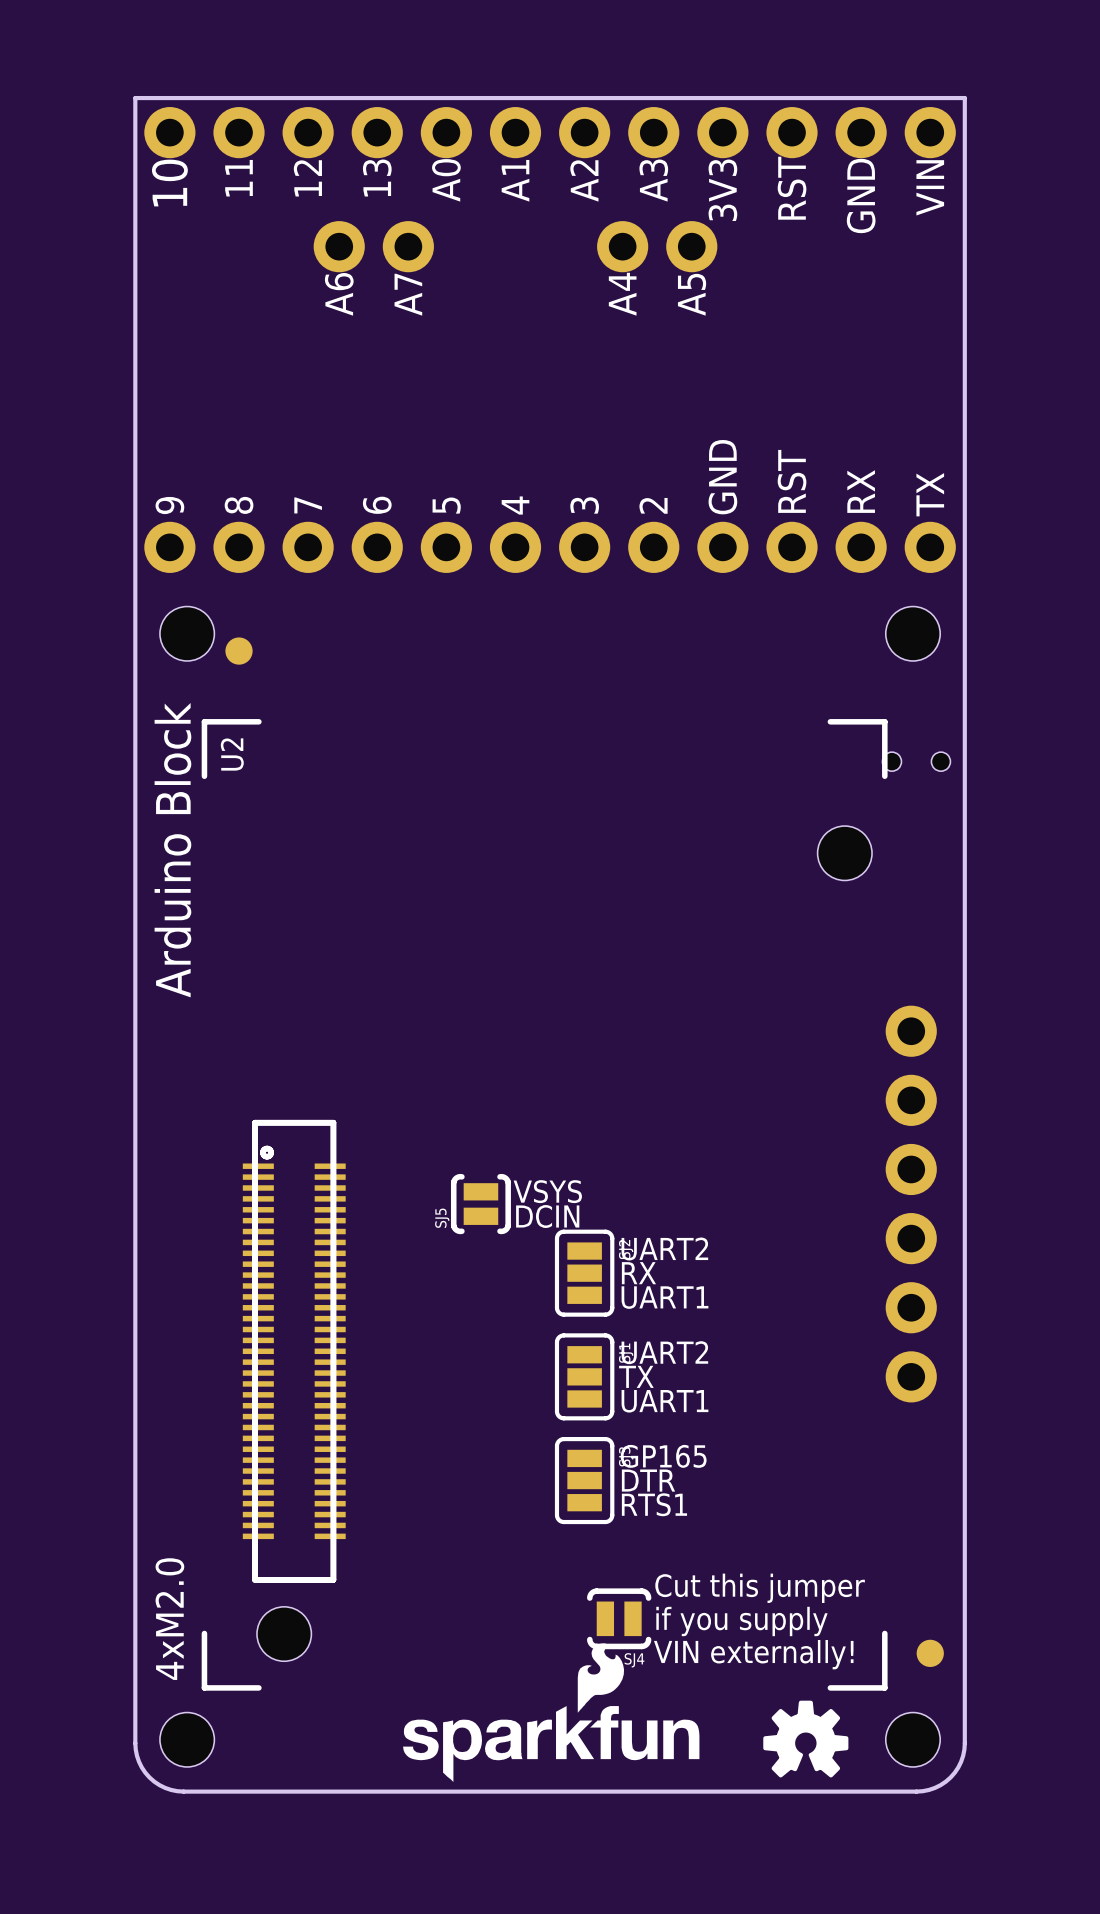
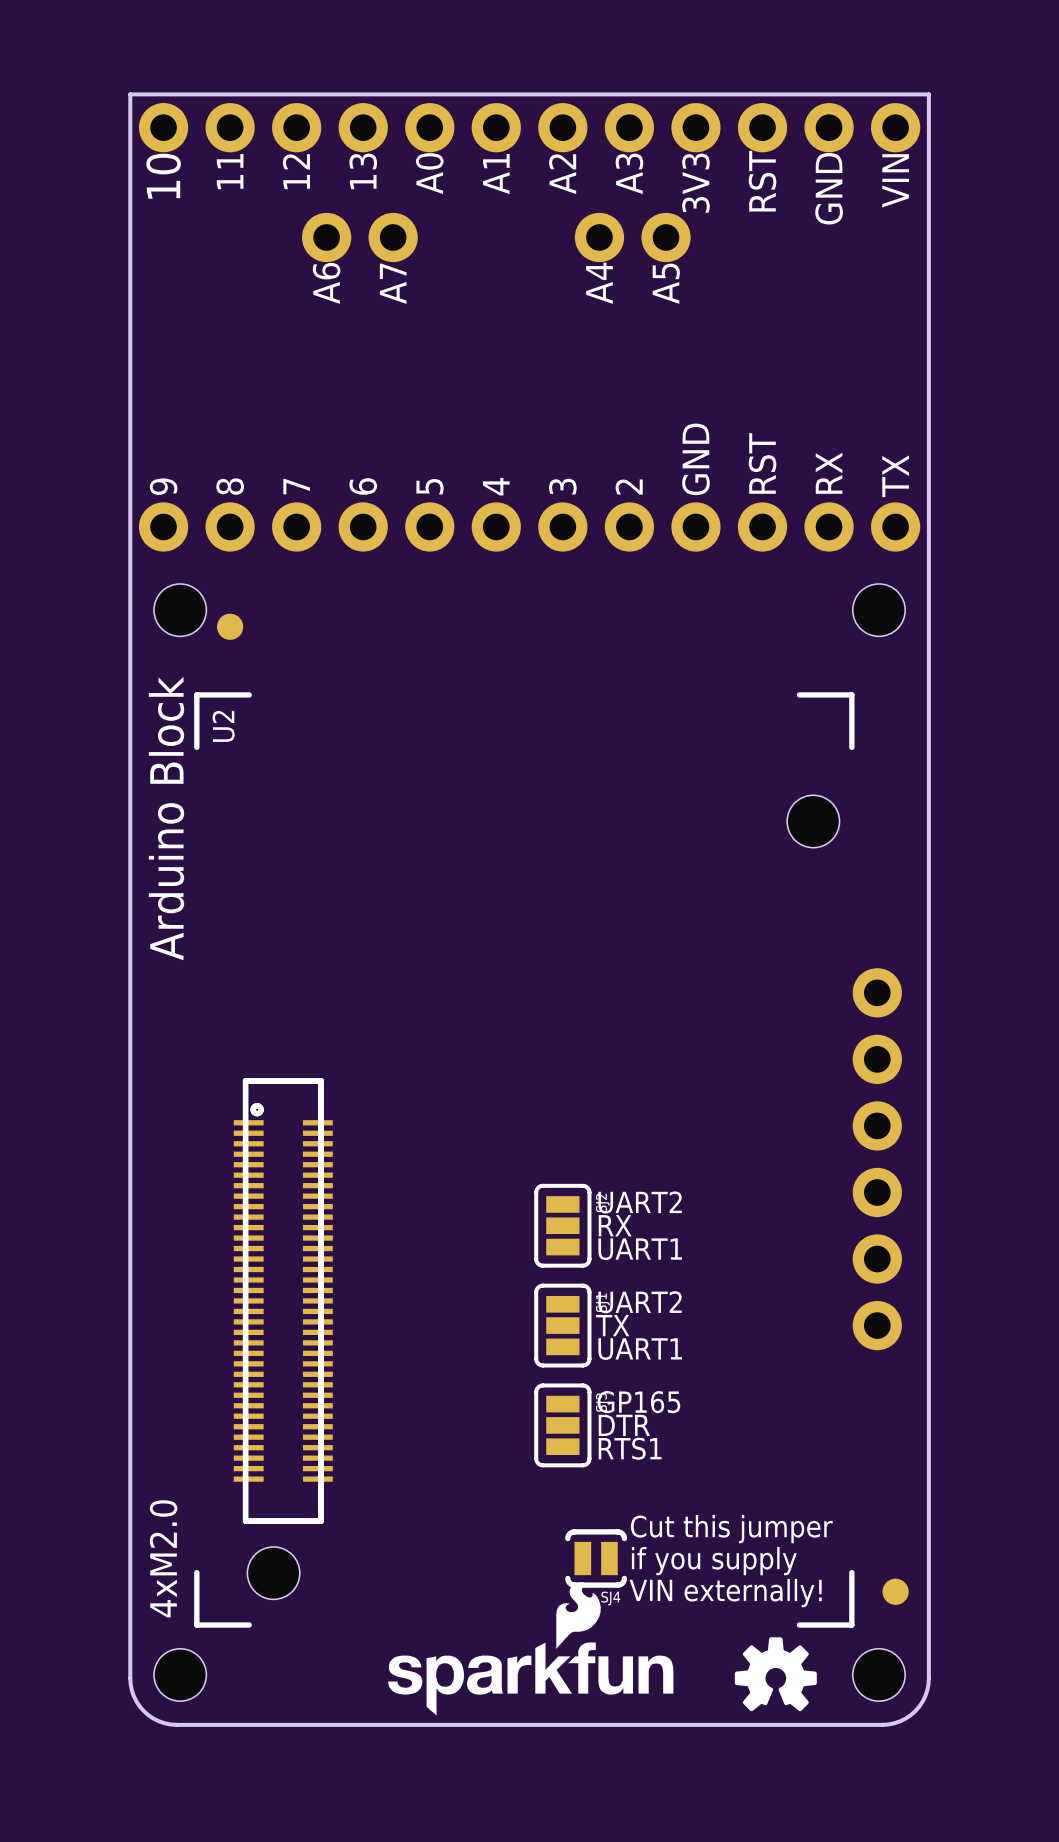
part: (916, 761) -> none
text: VSYS (547, 1191) -> none
SJ5: (480, 1204) -> none
text: DCIN (547, 1216) -> none

